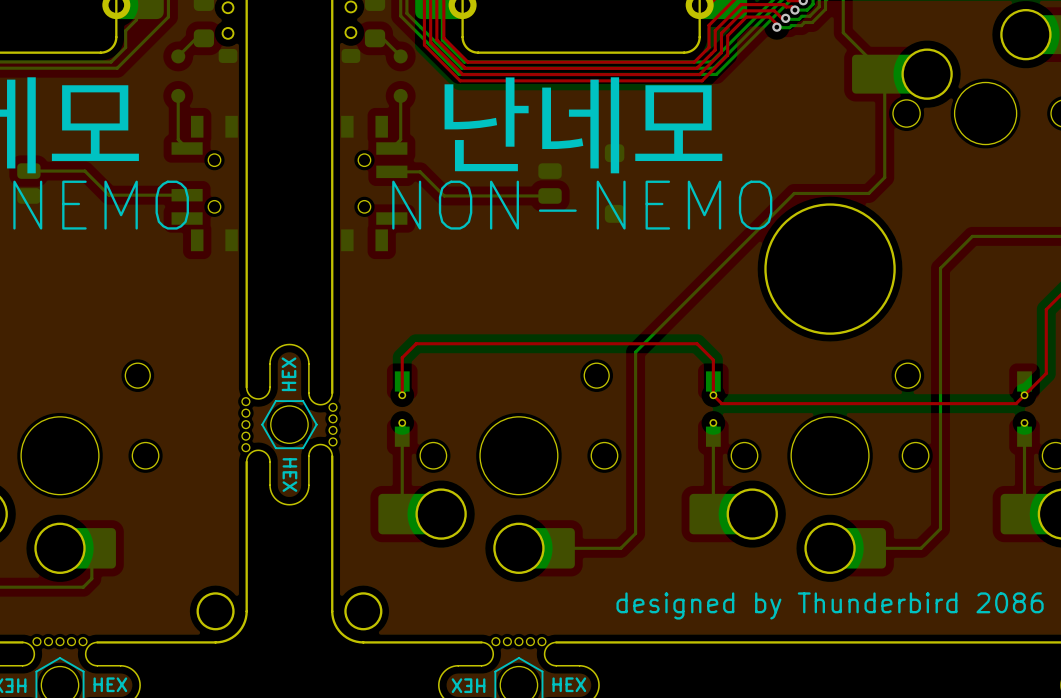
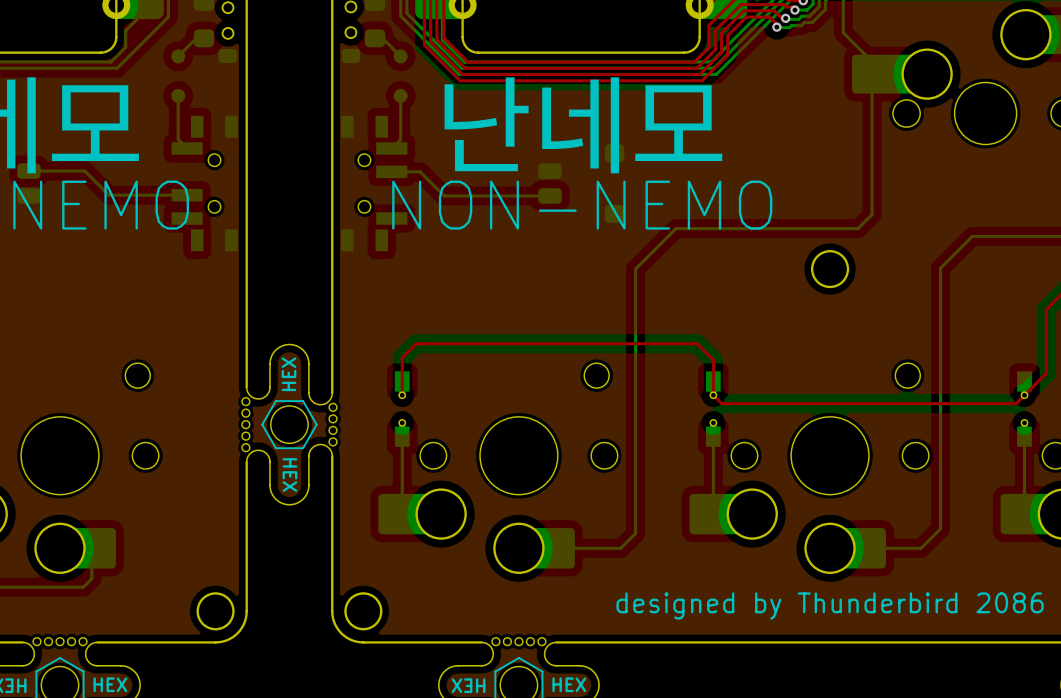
bottom track: (884, 74) (884, 177) (868, 193) (794, 193) (635, 352) -> (884, 74) (872, 86) (872, 214) (858, 228) (676, 228) (635, 269) (635, 352)
round board edge size: [764, 203, 896, 335] -> [810, 250, 850, 289]

